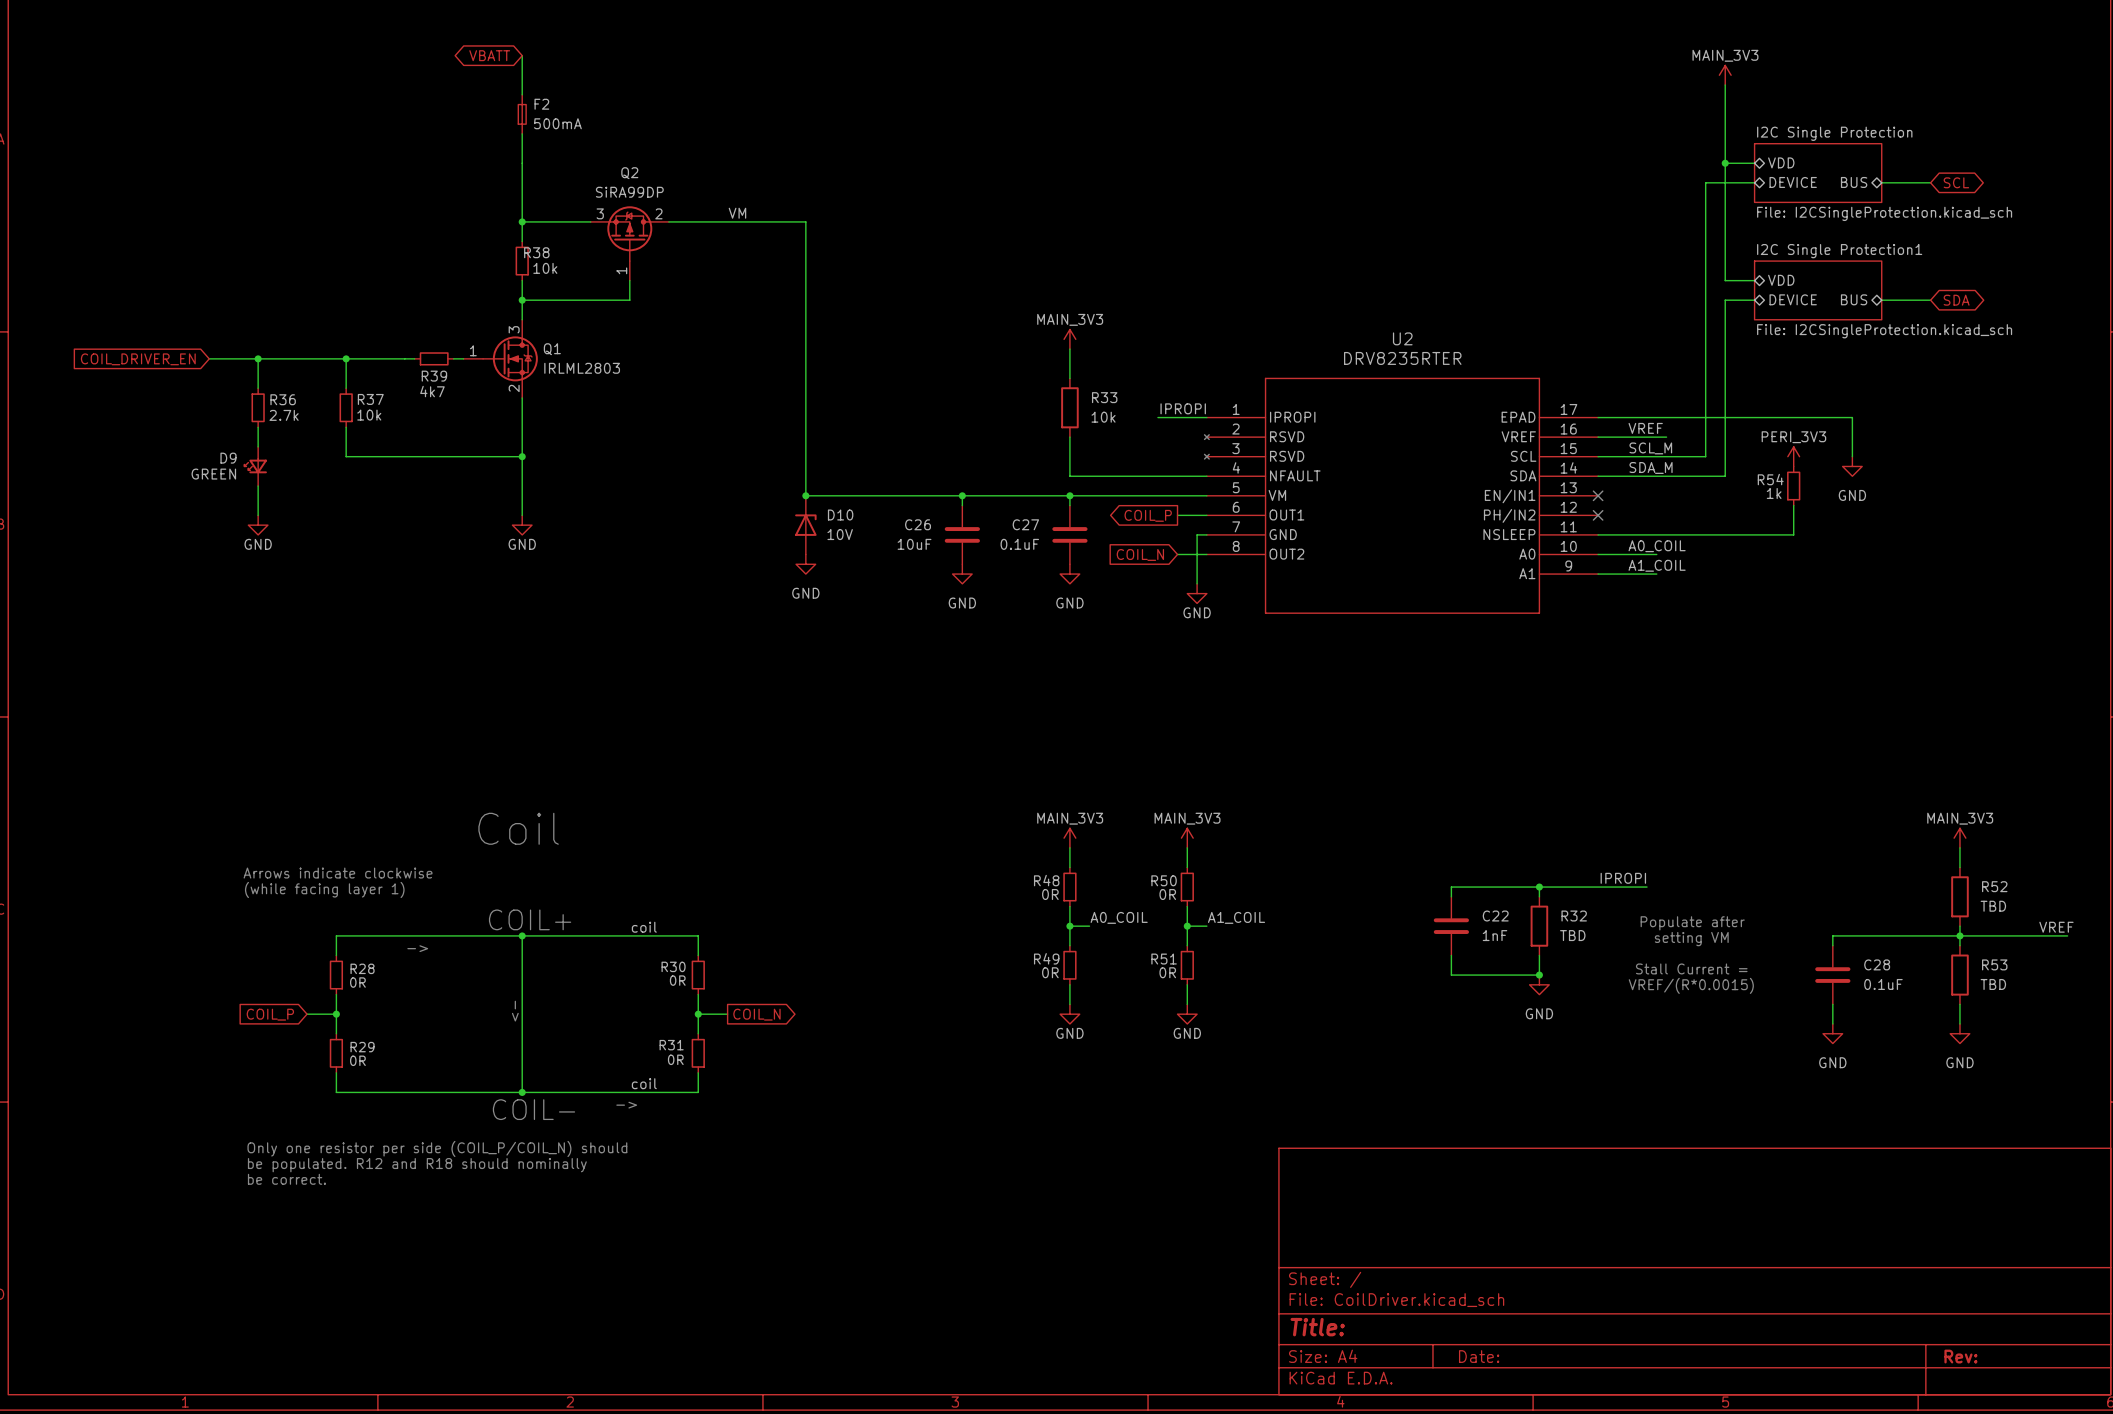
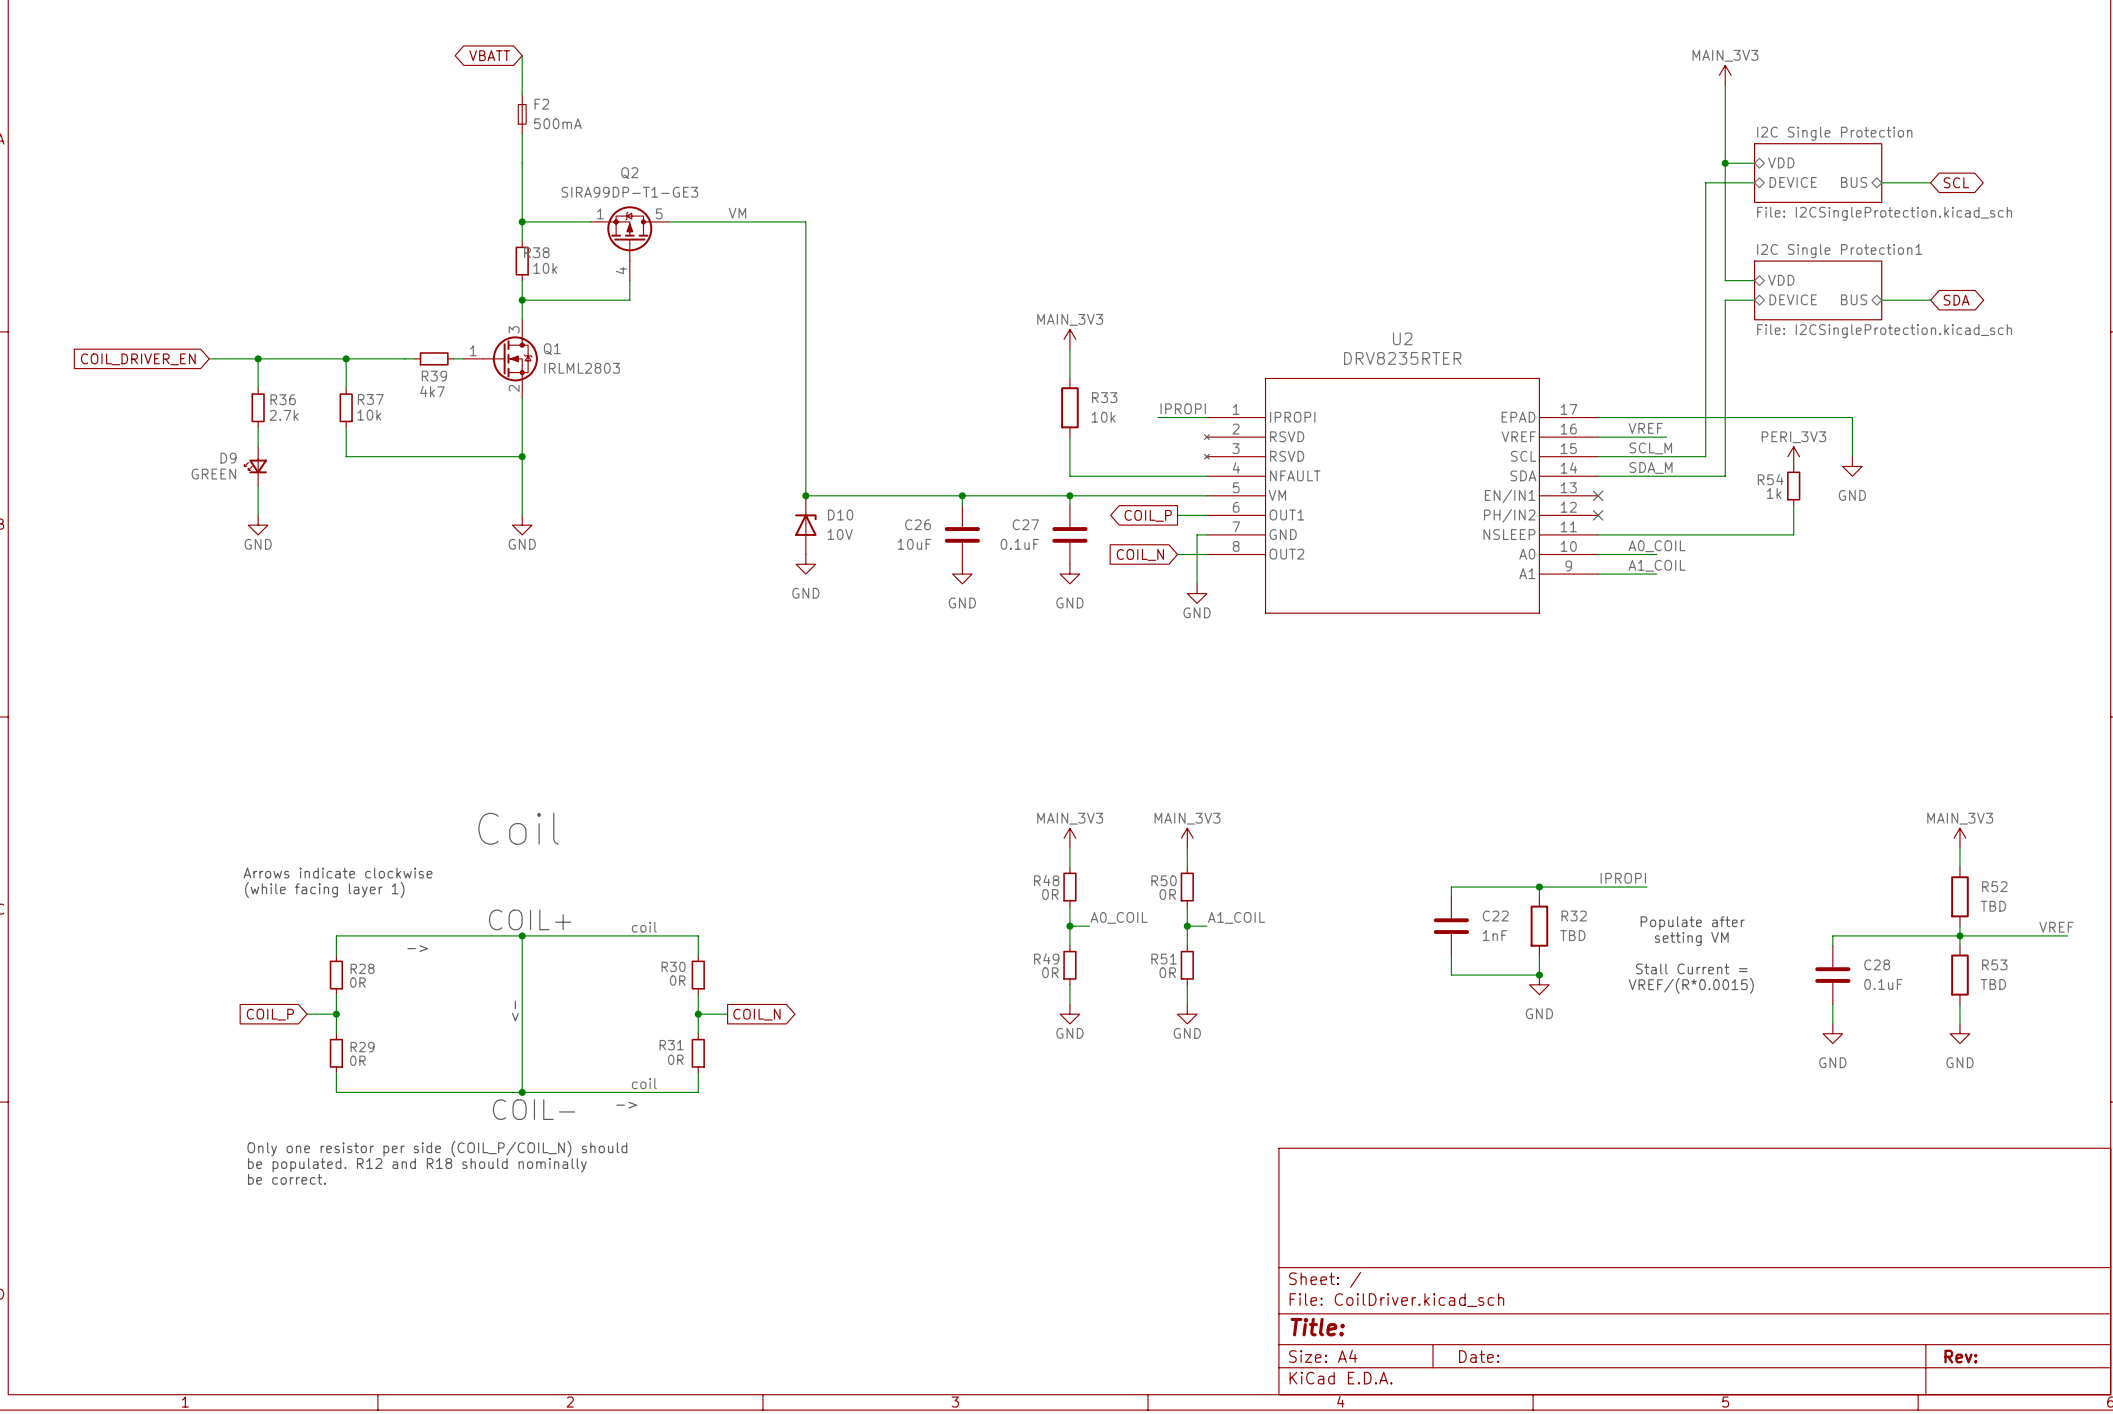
Q2 value: SiRA99DP (629, 192) -> SIRA99DP-T1-GE3 (629, 192)
Q2 pin number: 3 (600, 213) -> 1 (600, 213)
Q2 pin number: 2 (658, 213) -> 5 (659, 213)
Q2 pin number: 1 (621, 270) -> 4 (621, 270)

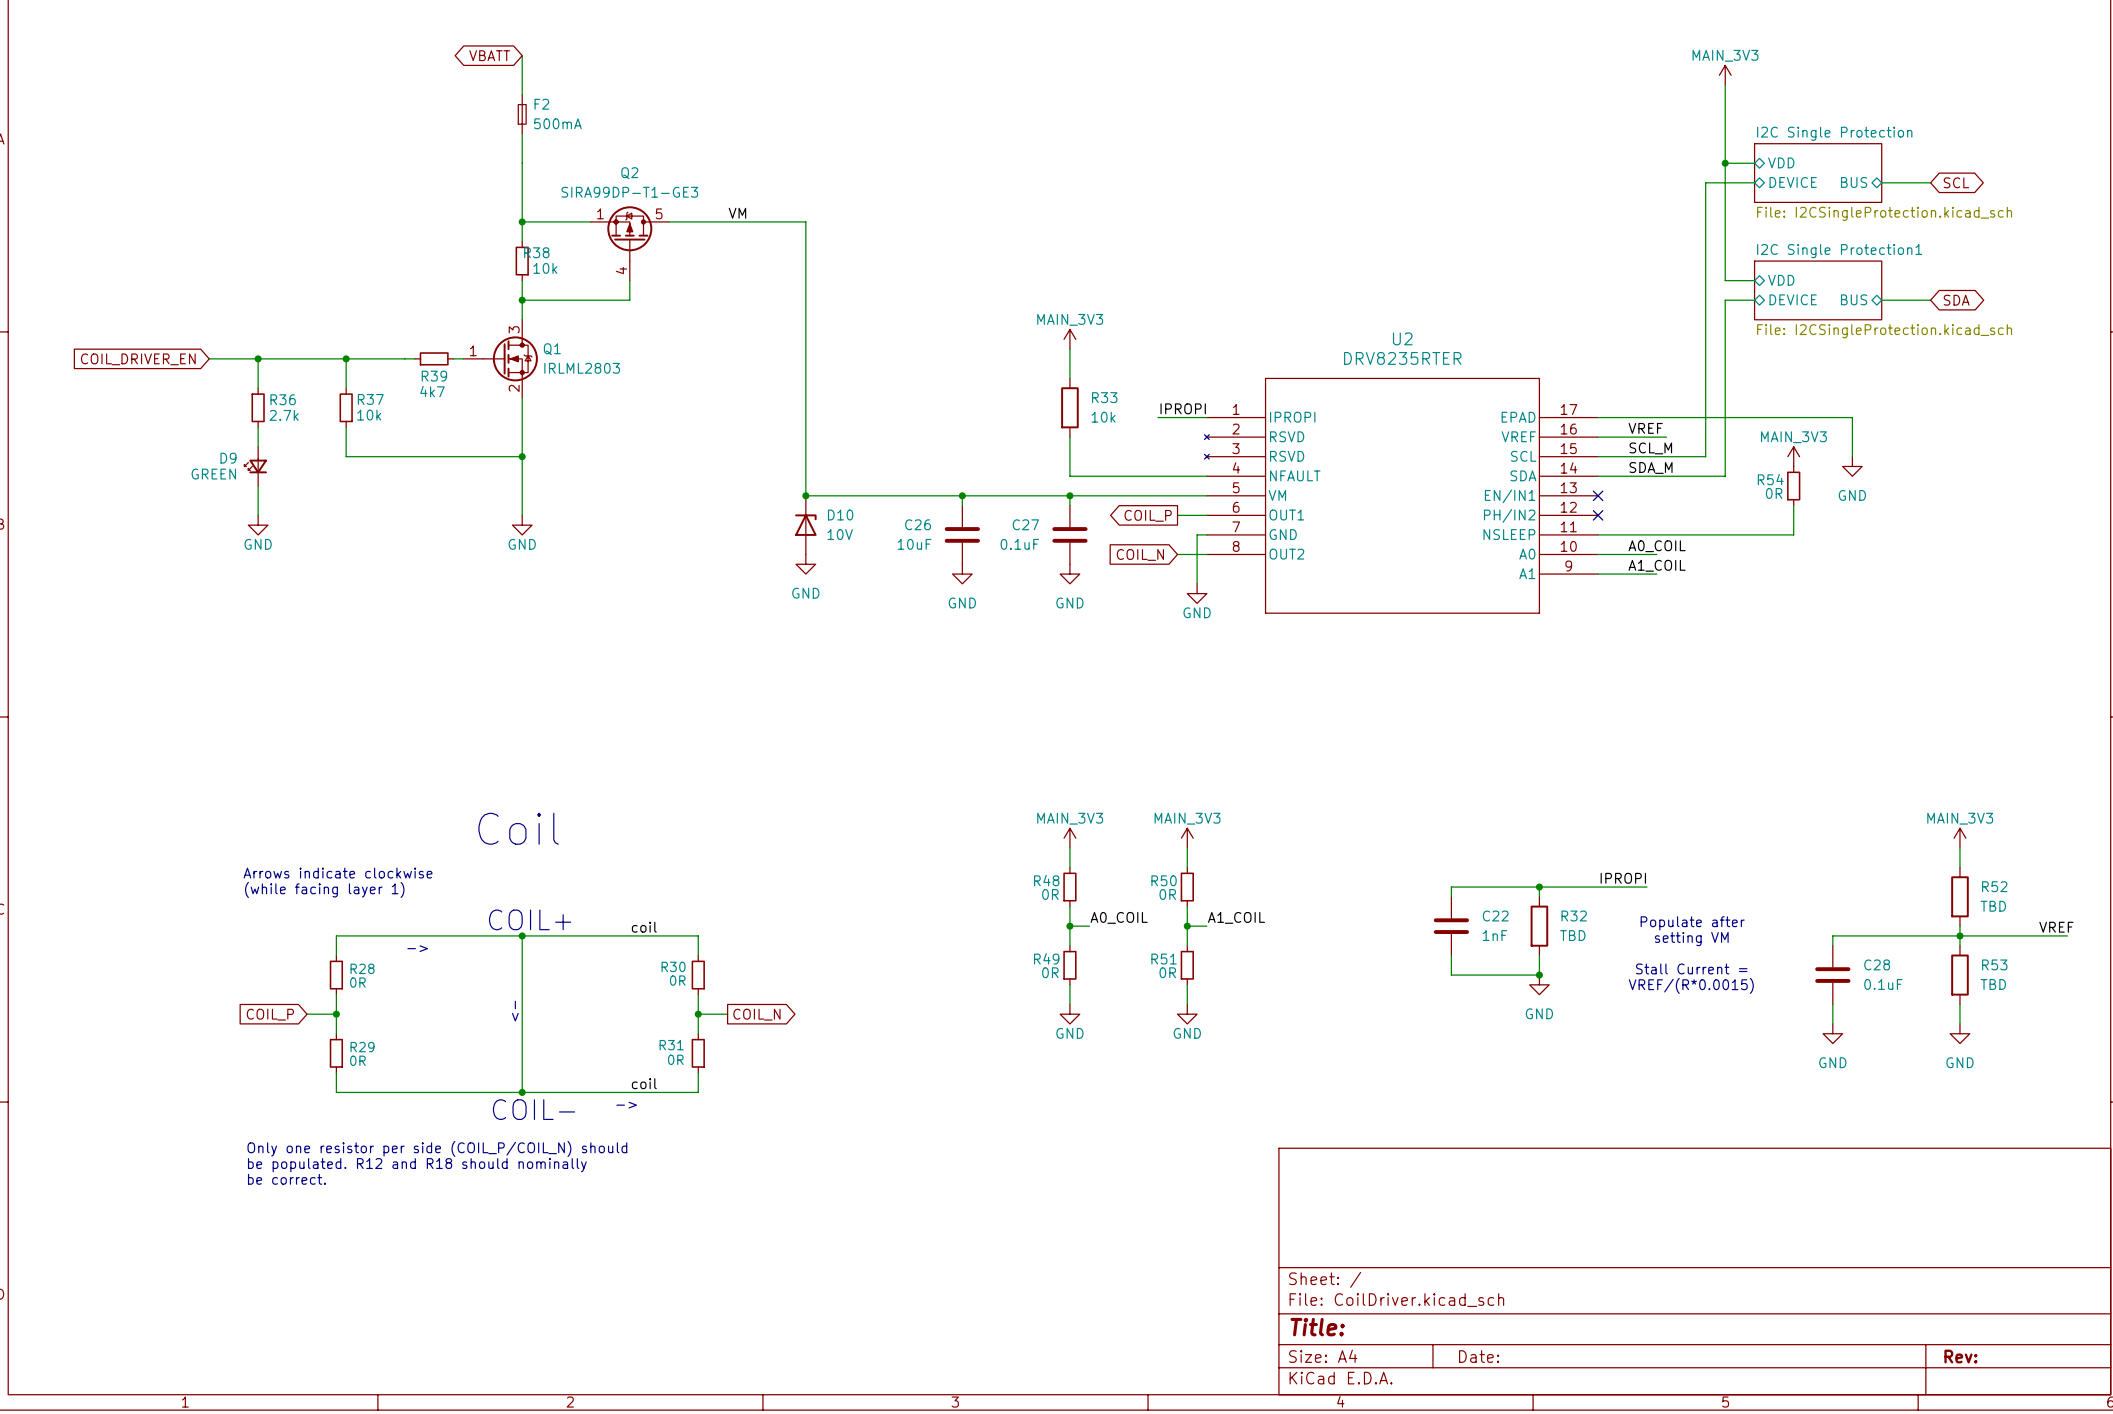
power symbol: PERI_3V3 (1793, 456) -> MAIN_3V3 (1793, 456)
R54 value: 1k (1774, 493) -> 0R (1774, 493)

